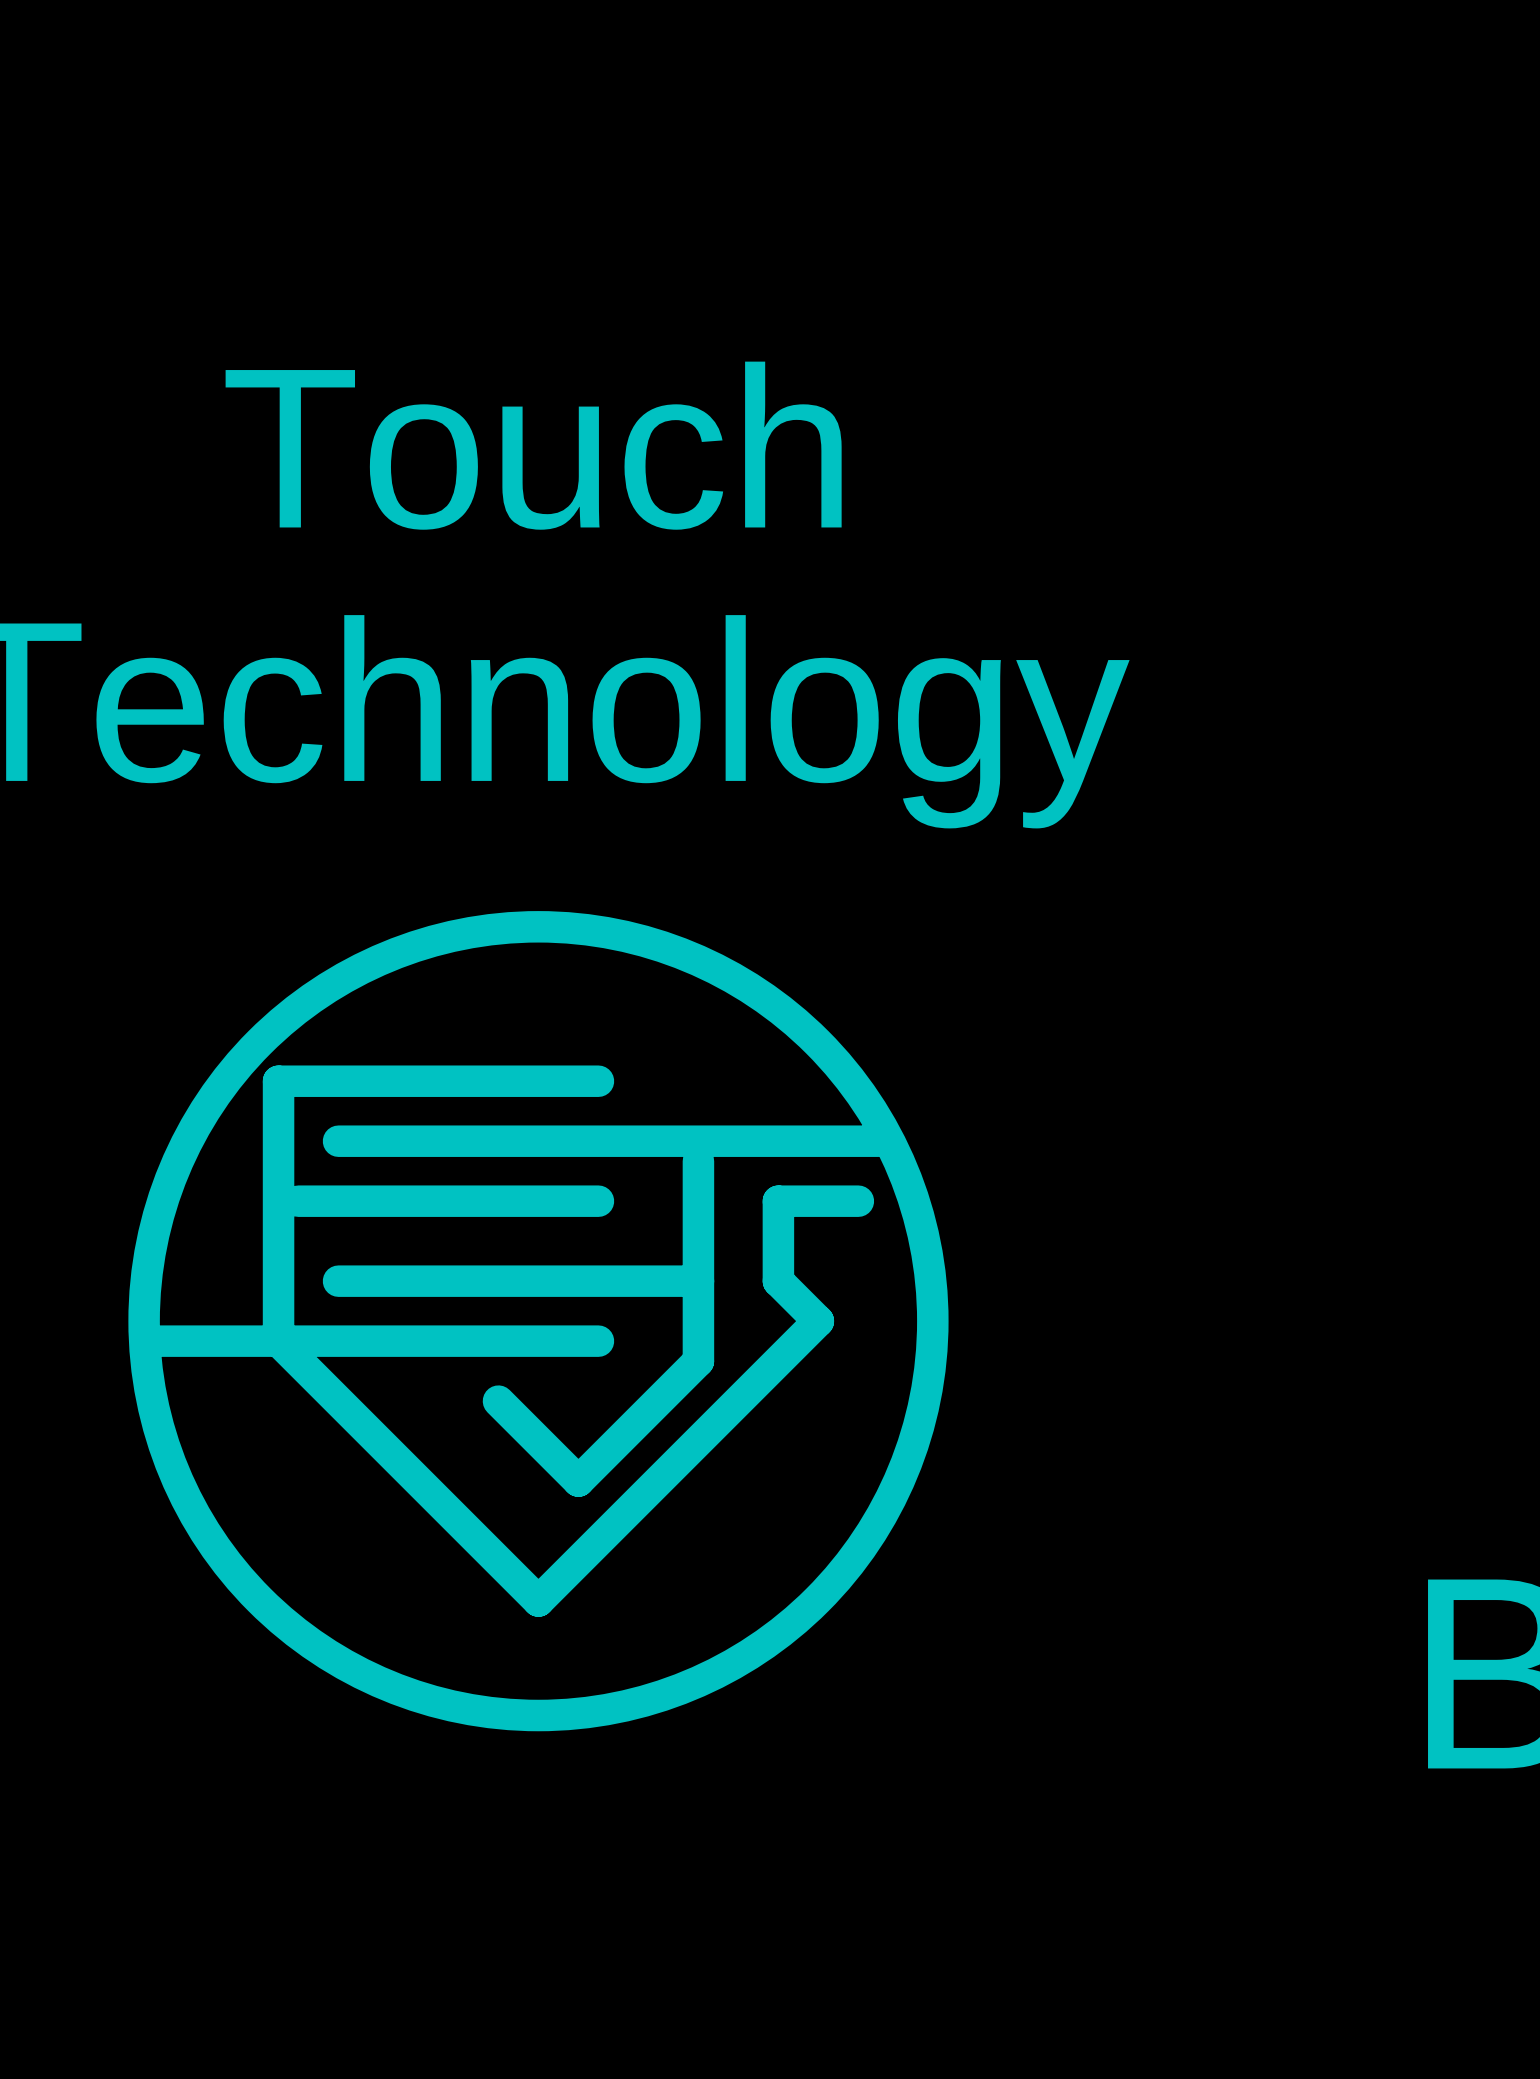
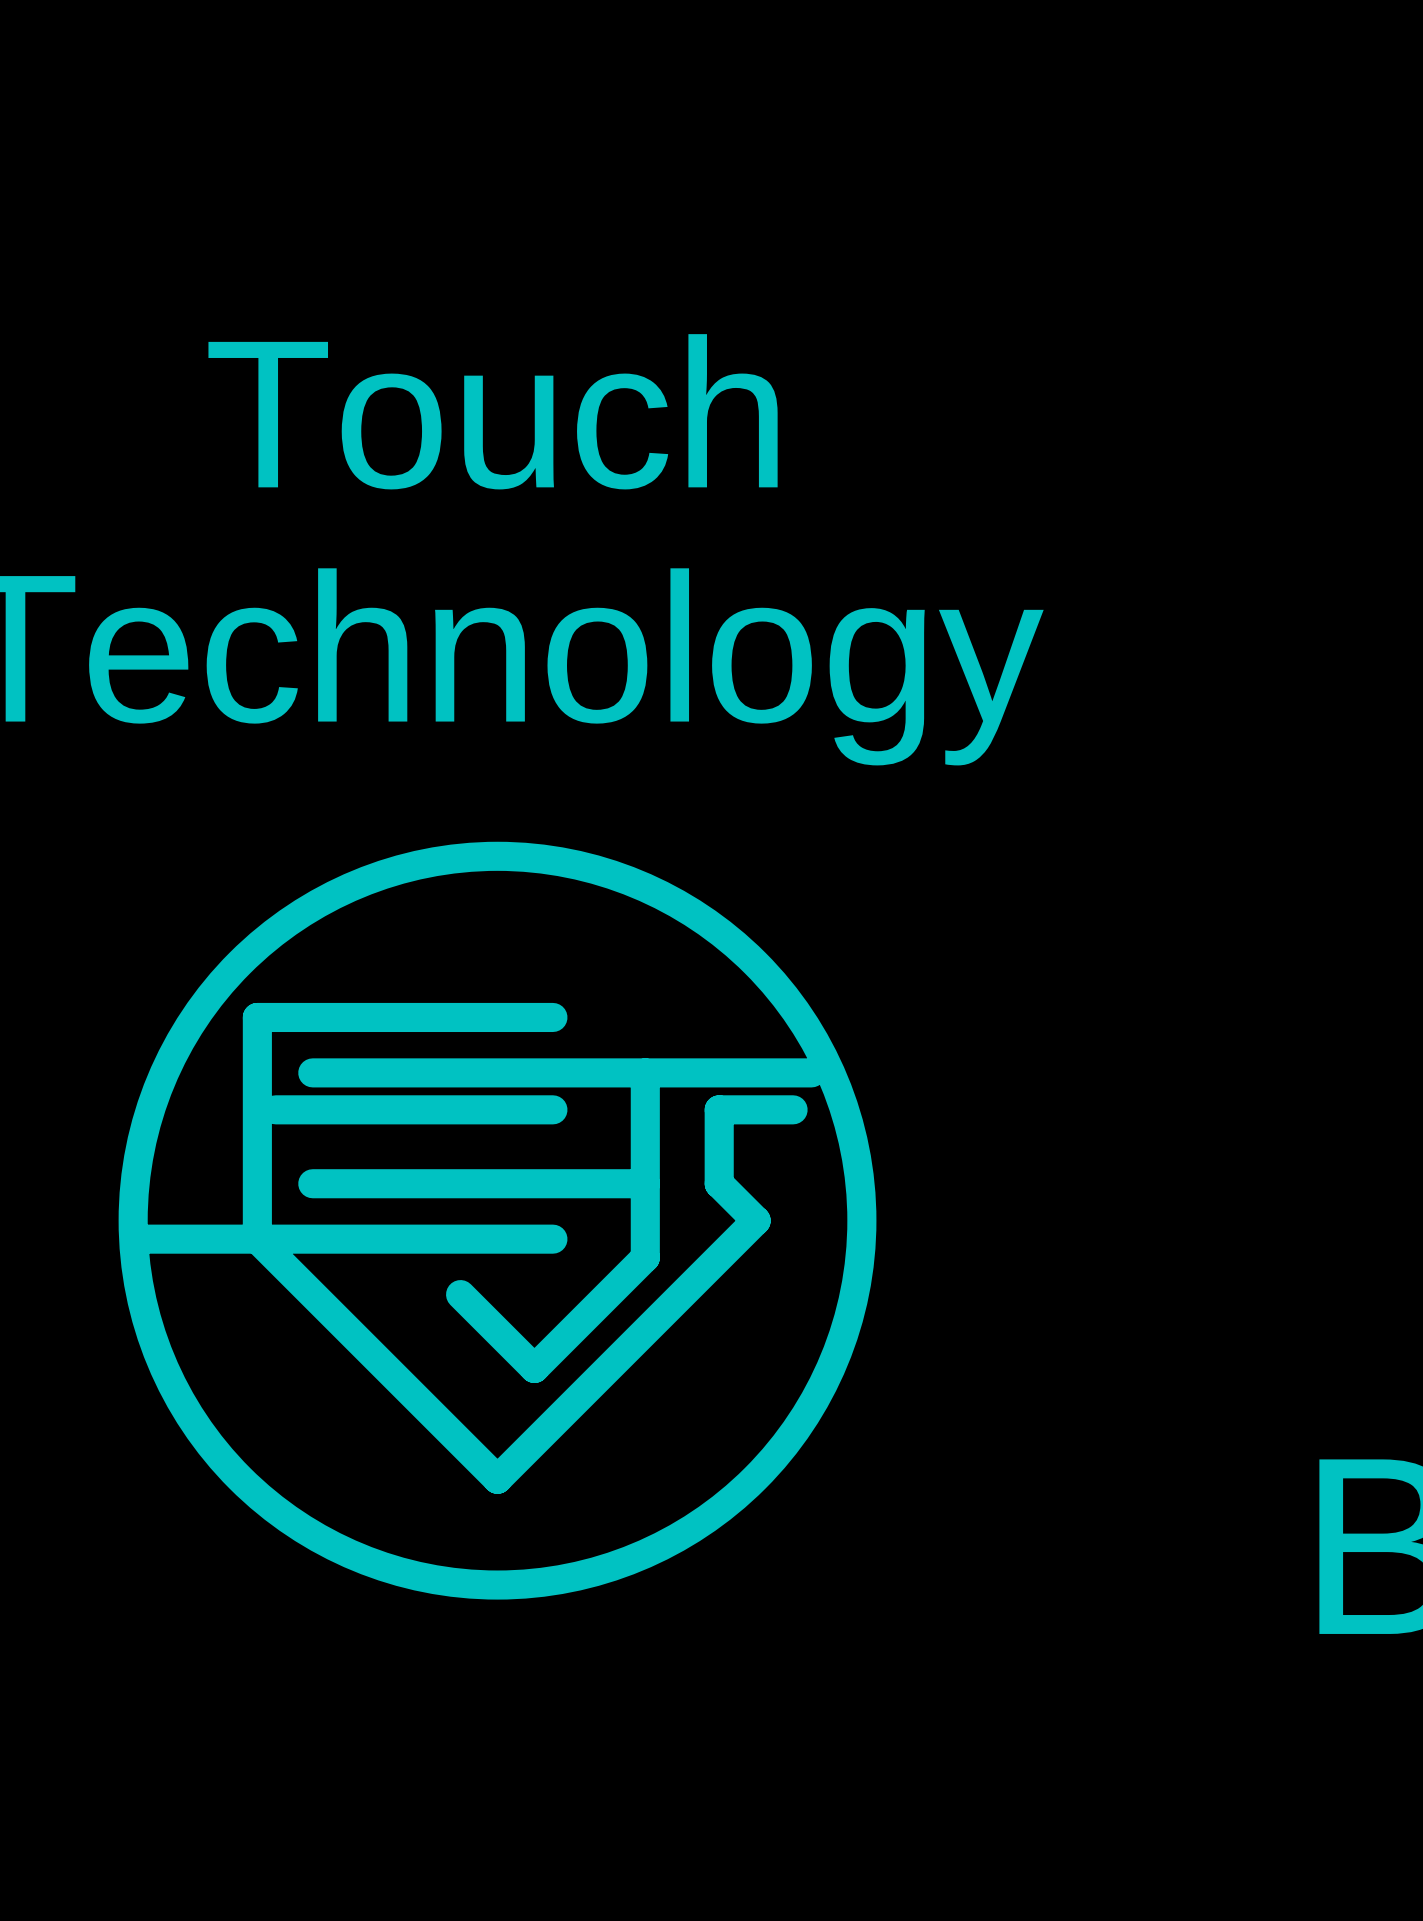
line: (598, 1081) (278, 1081) (278, 1101) -> (552, 1017) (257, 1017)
line: (338, 1141) (878, 1141) -> (312, 1072) (811, 1072)

